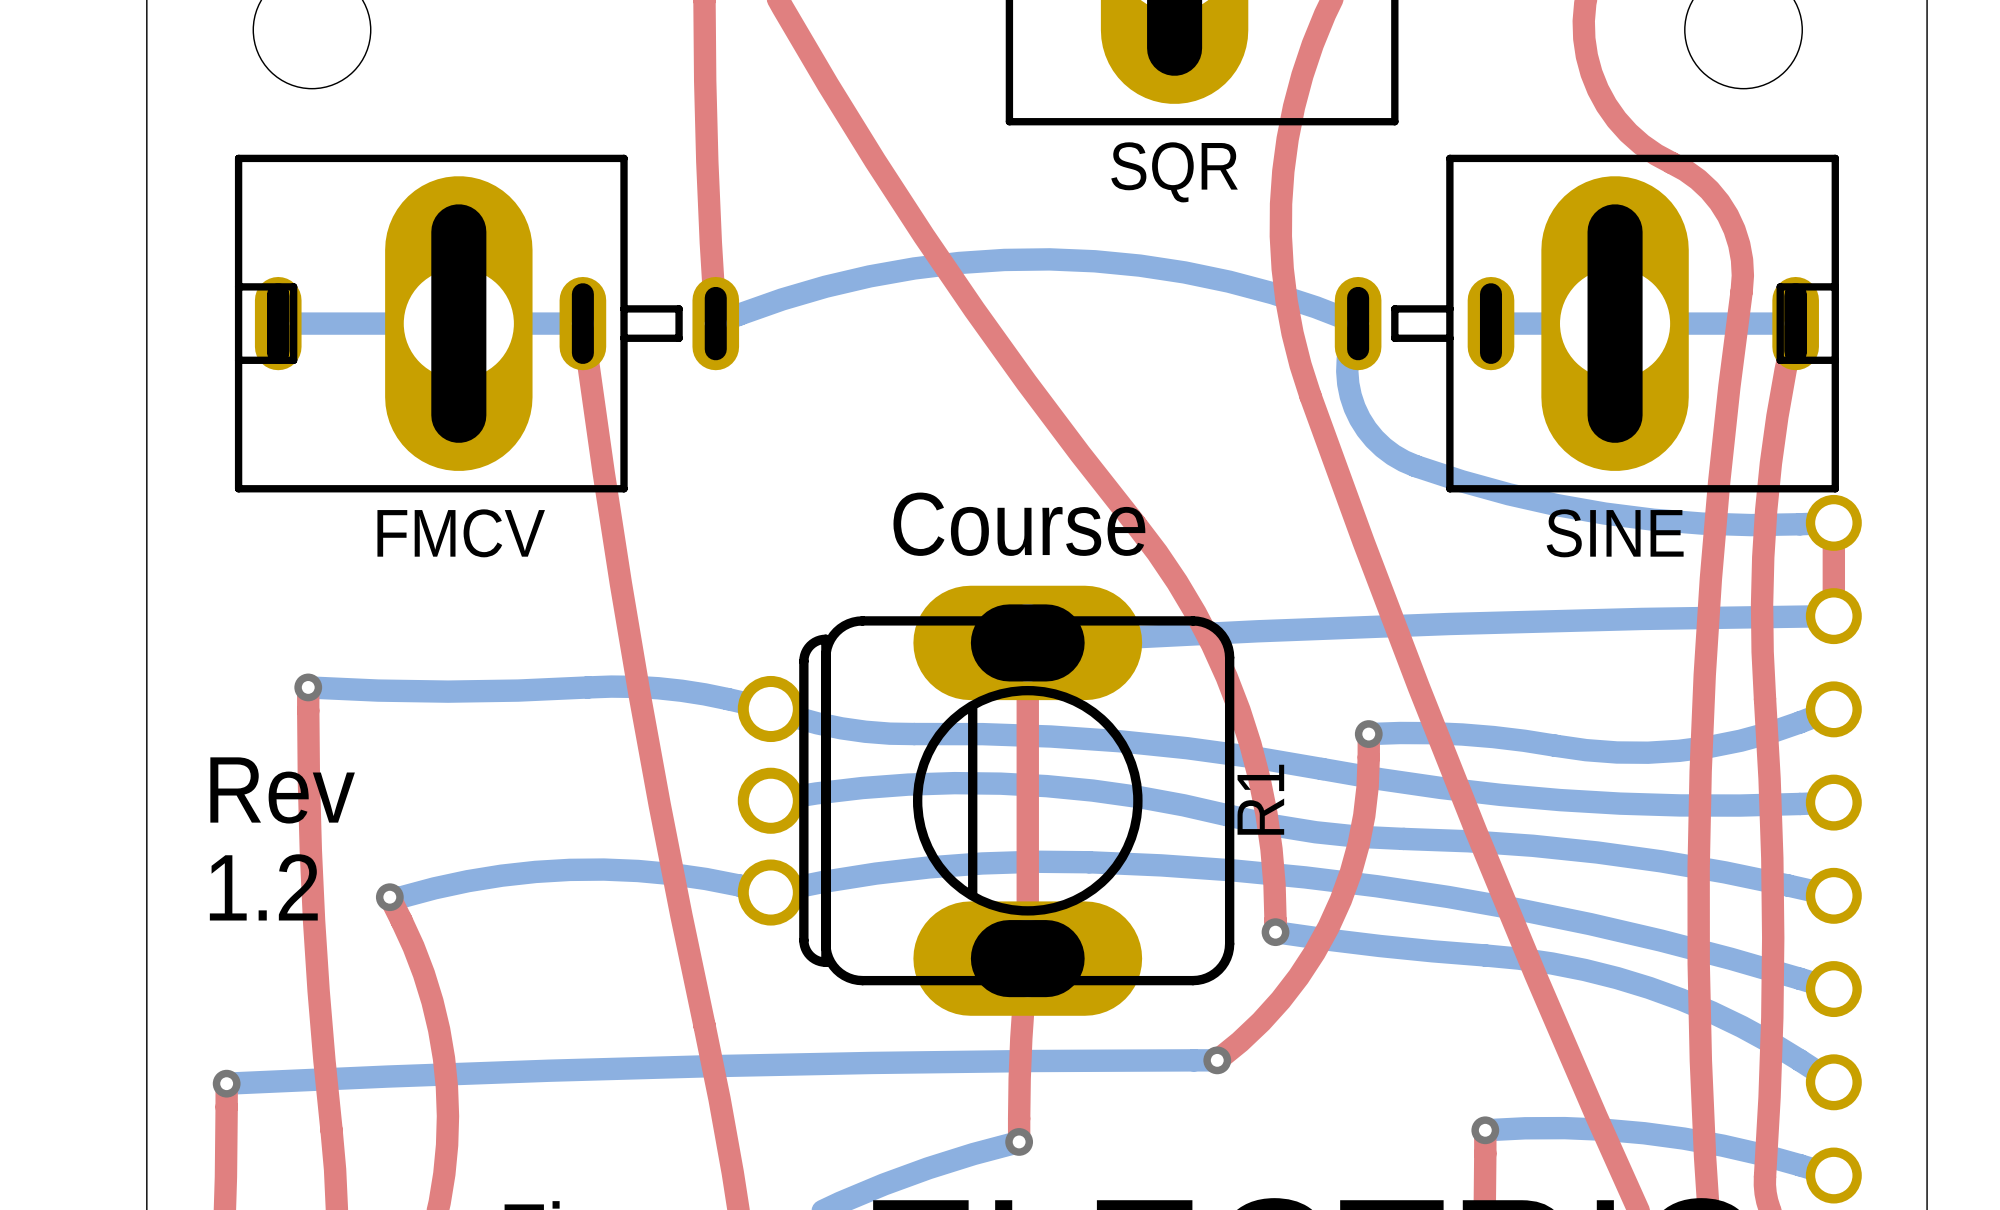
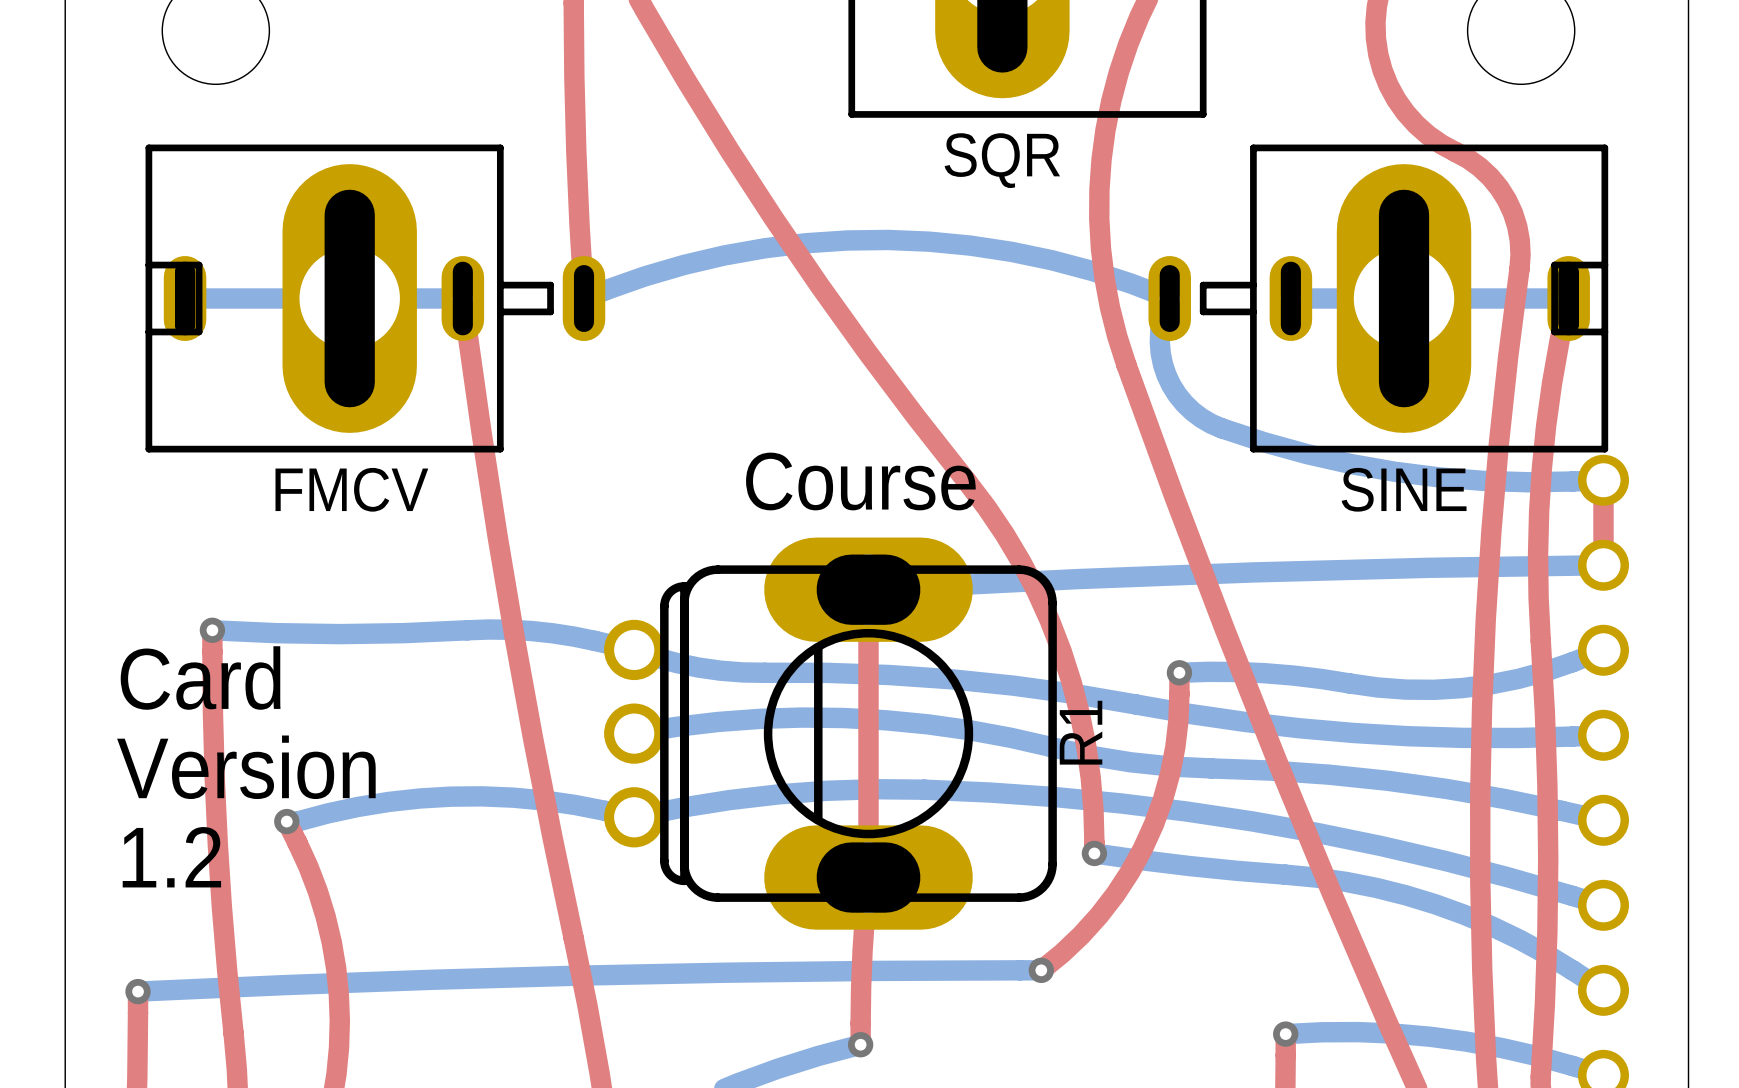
text: none -> Card (200, 678)
text: Rev (282, 790) -> none
text: none -> Version (246, 767)
text position: 1.2 (263, 887) -> 1.2 (171, 857)

